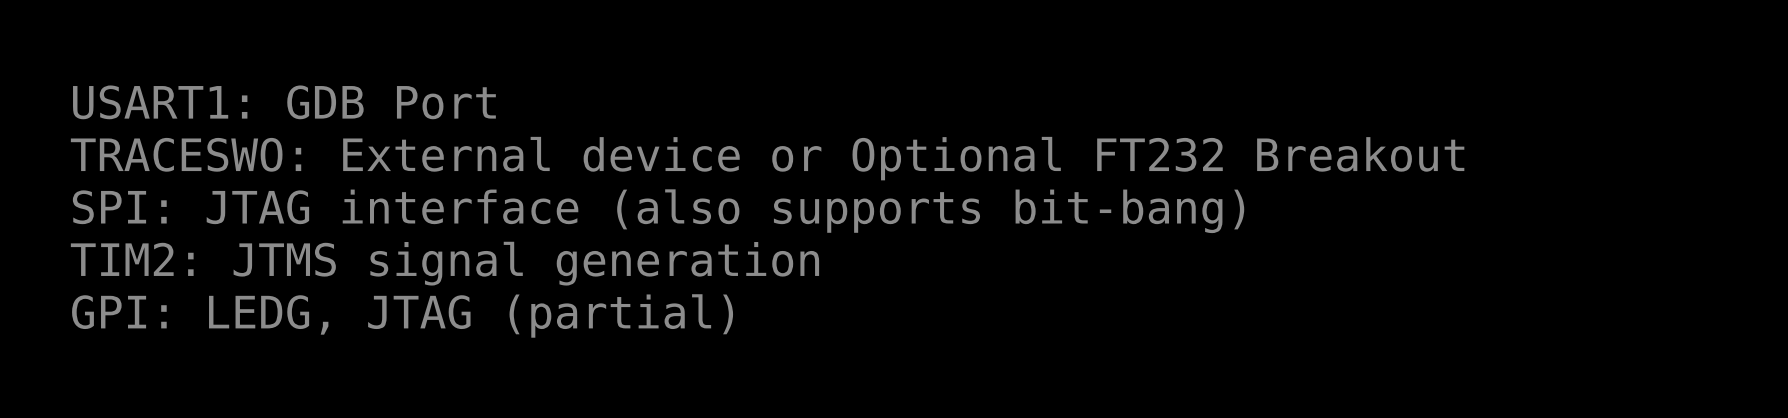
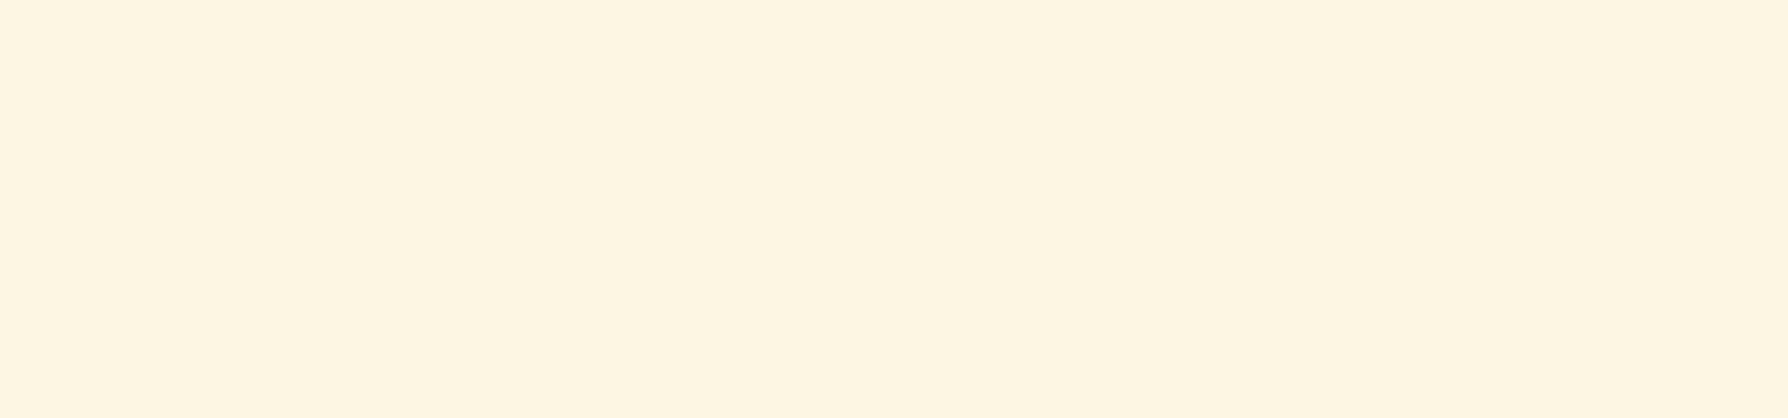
text: USART1: GDB Port (284, 102) -> none
text: TRACESWO: External device or Optional FT232 Breakout (767, 158) -> none
text: SPI: JTAG interface (also supports bit-bang) (658, 211) -> none
text: TIM2: JTMS signal generation (444, 263) -> none
text: GPI: LEDG, JTAG (partial) (402, 315) -> none

